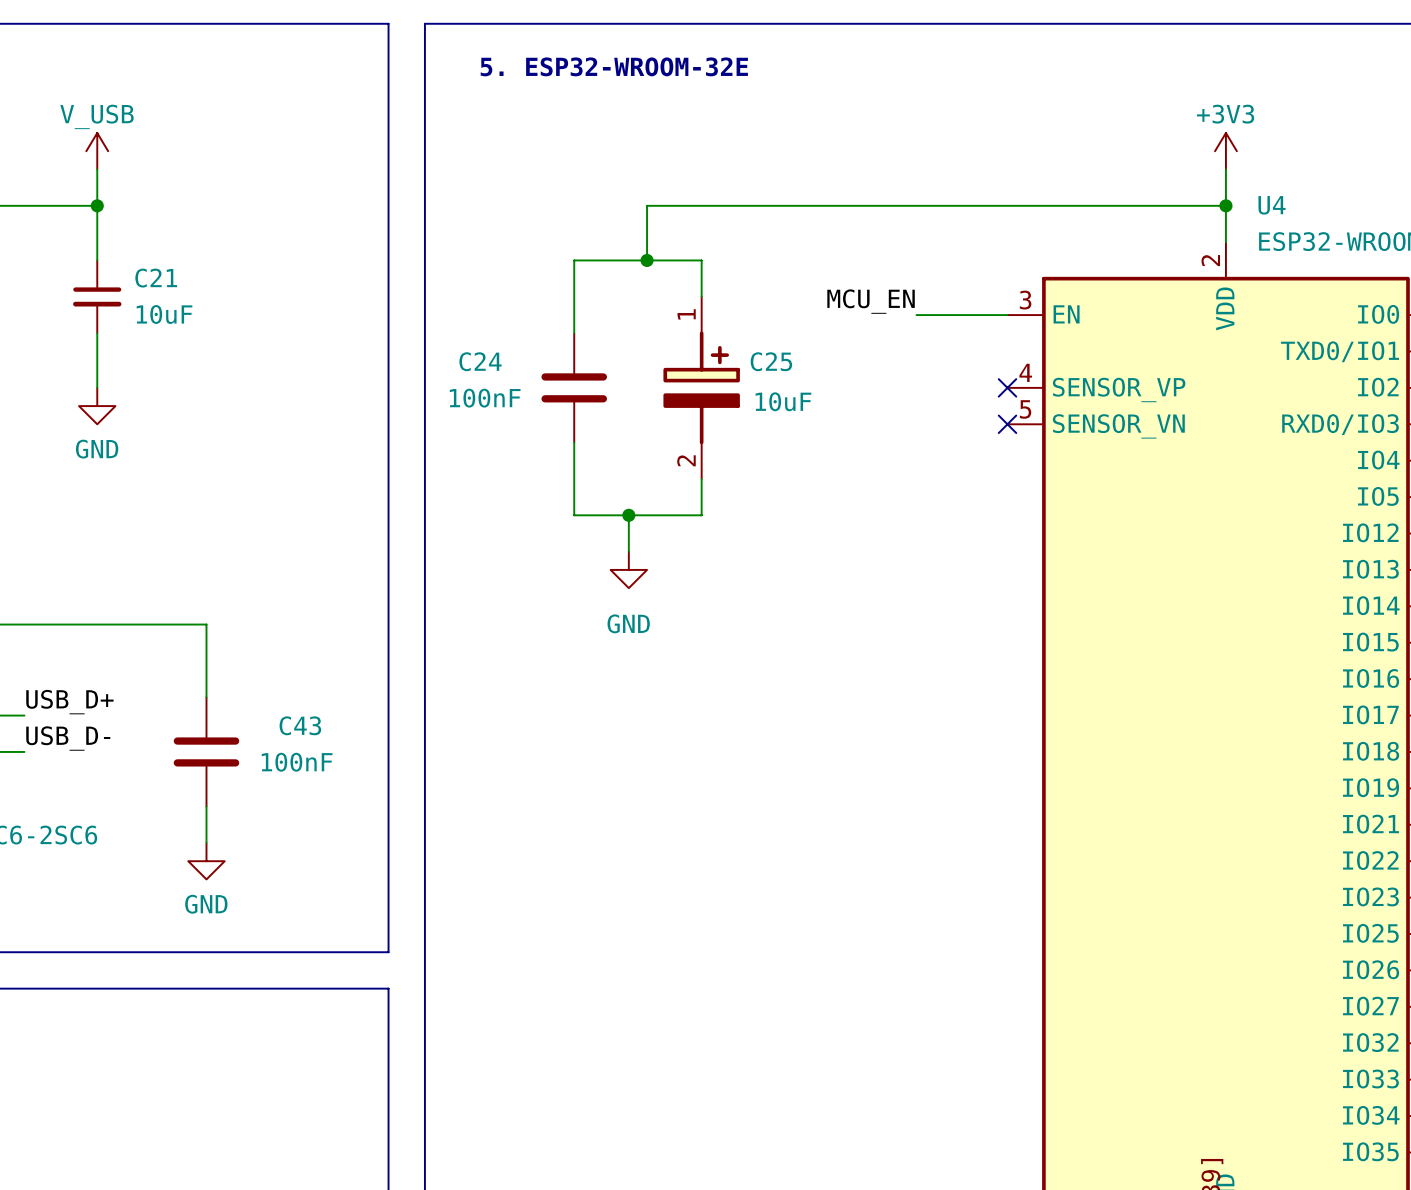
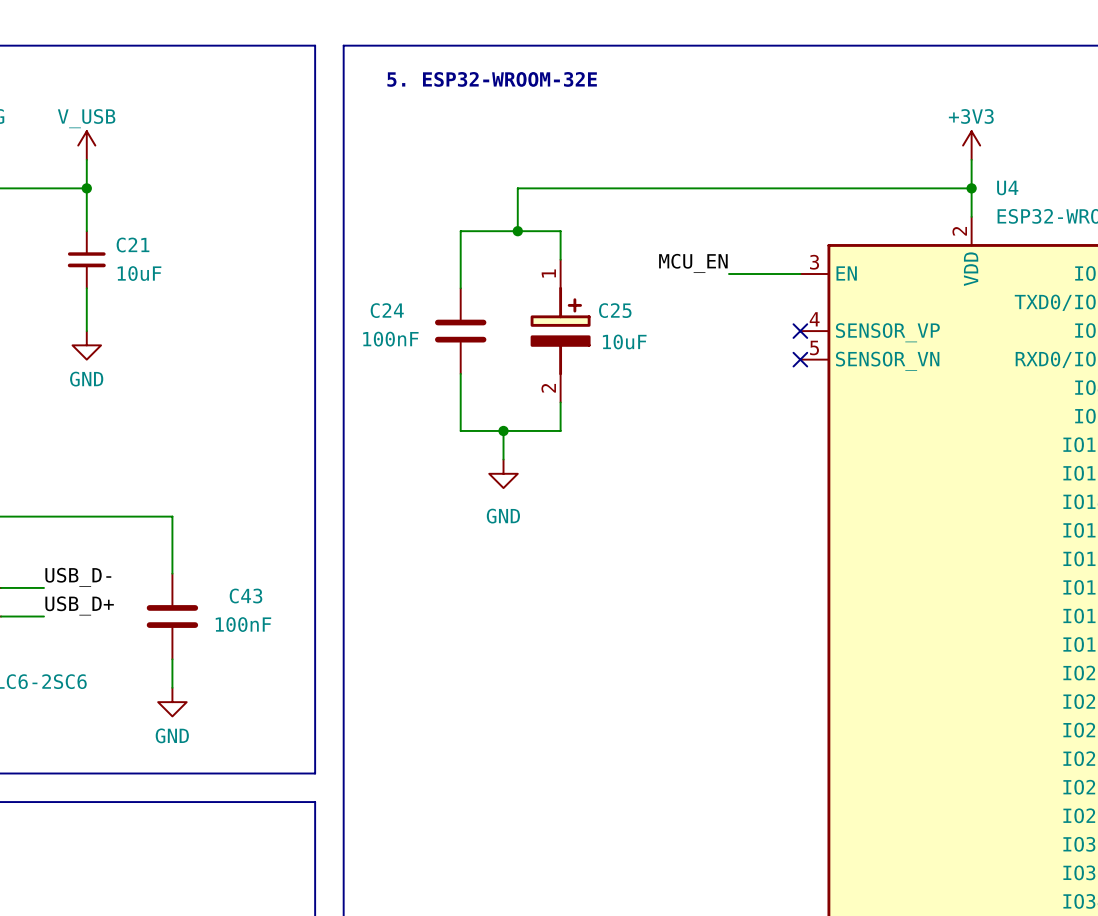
label position: USB_D+ (69, 702) -> USB_D+ (79, 605)
wire: none -> (29, 587) (43, 587)
label position: USB_D- (68, 738) -> USB_D- (78, 577)
wire: none -> (29, 616) (43, 616)

